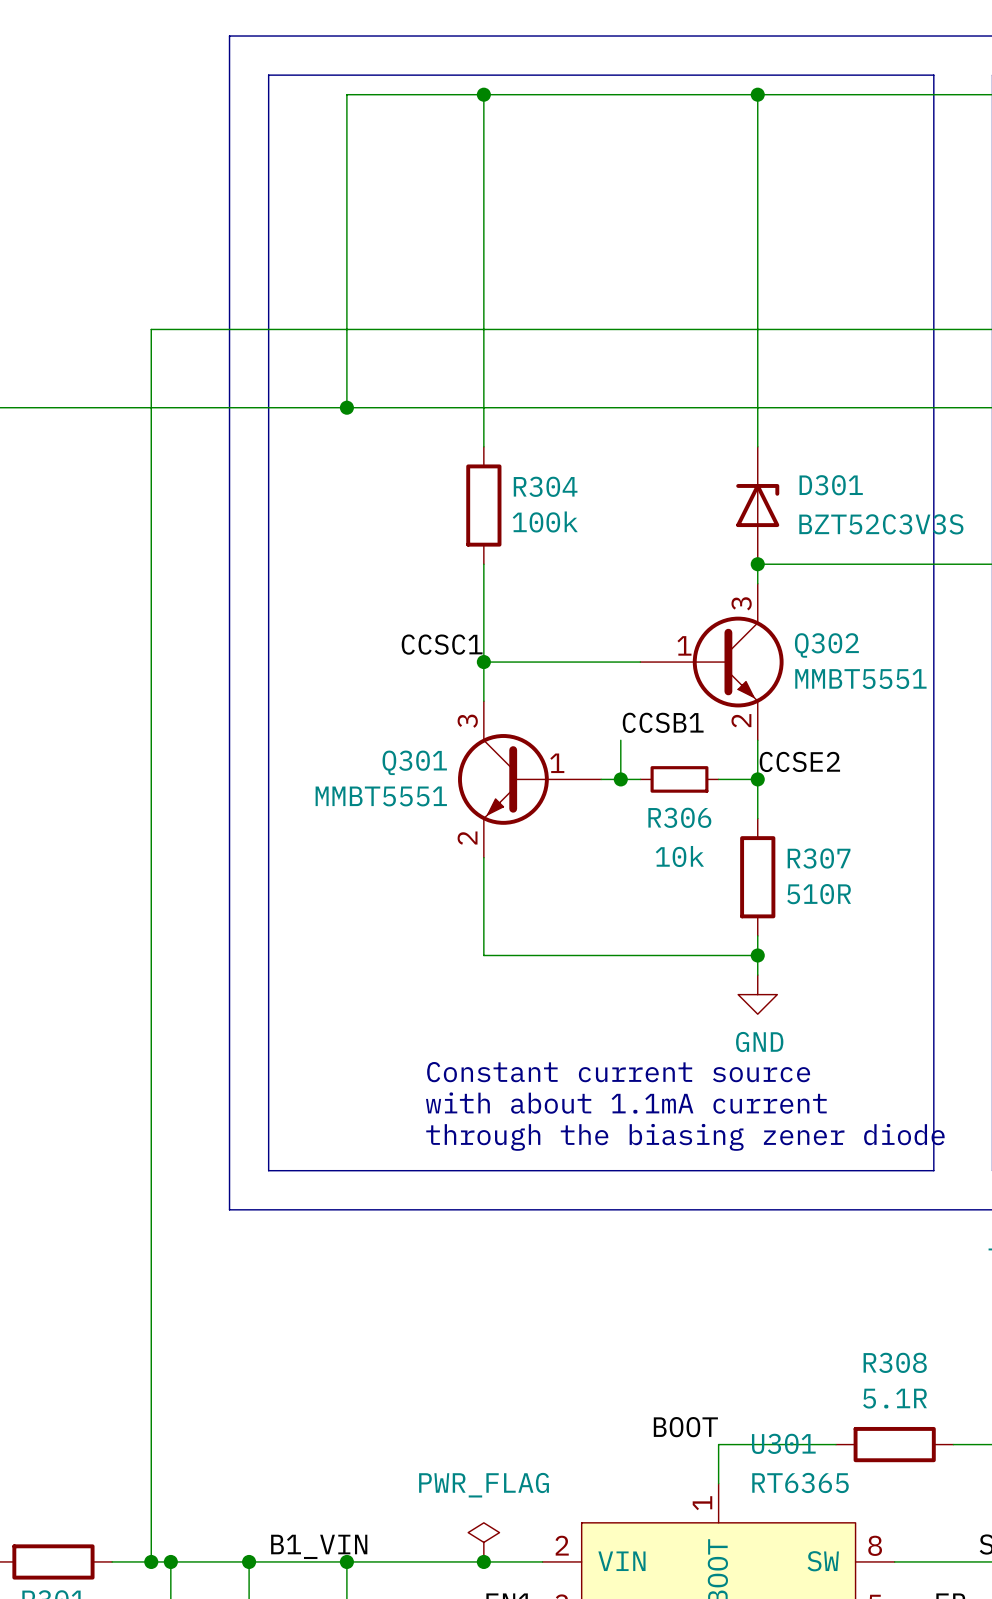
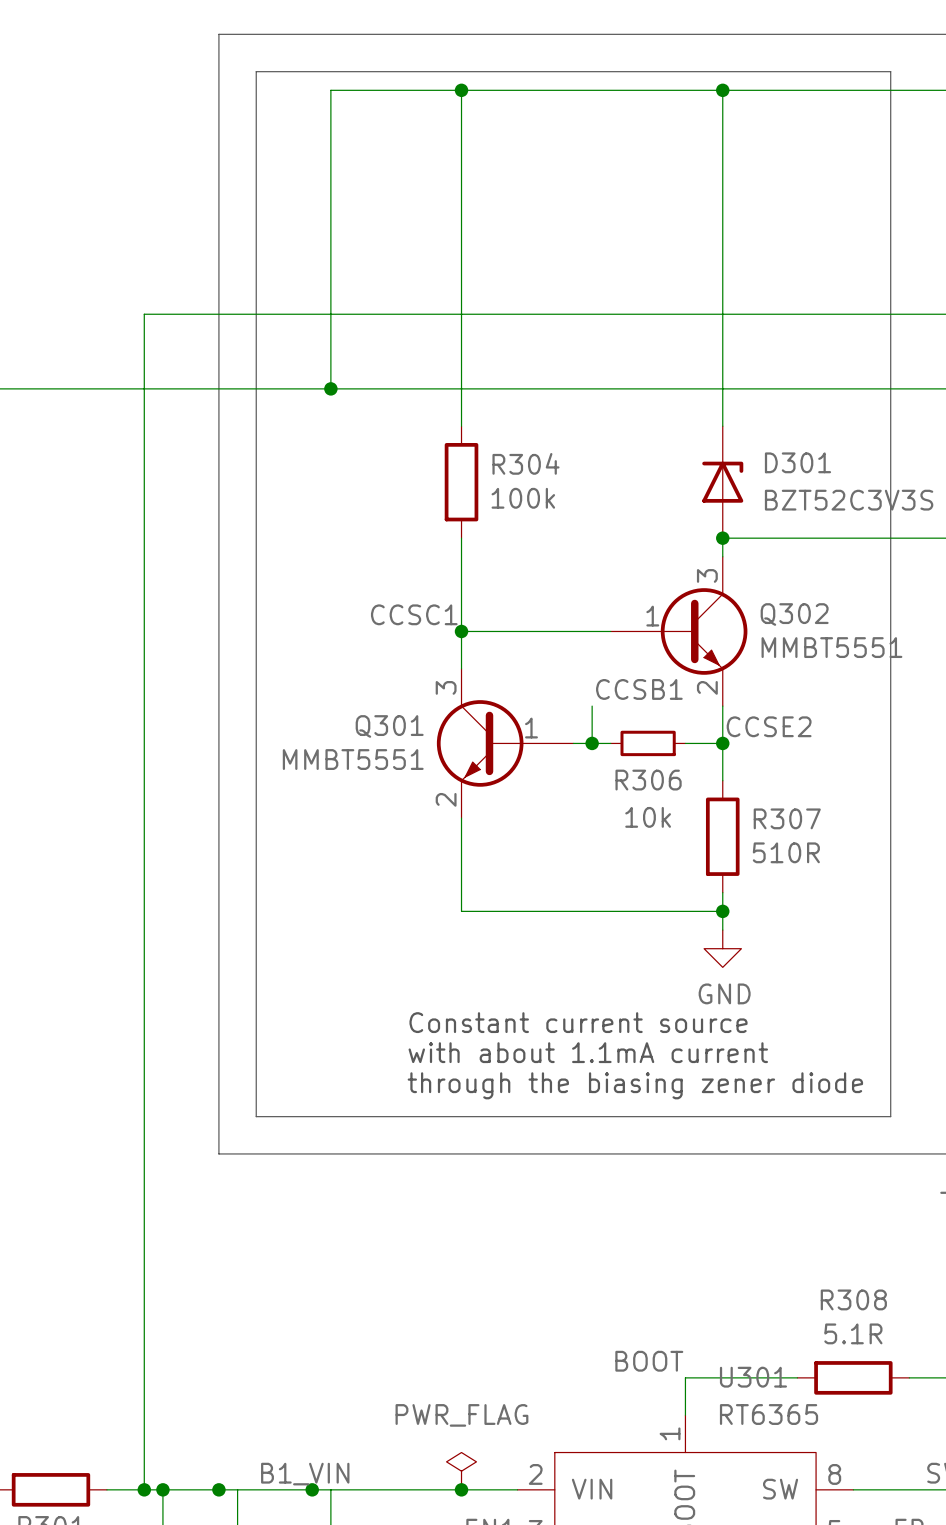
junction position: (249, 1561) -> (218, 1489)
junction position: (346, 1561) -> (312, 1489)

